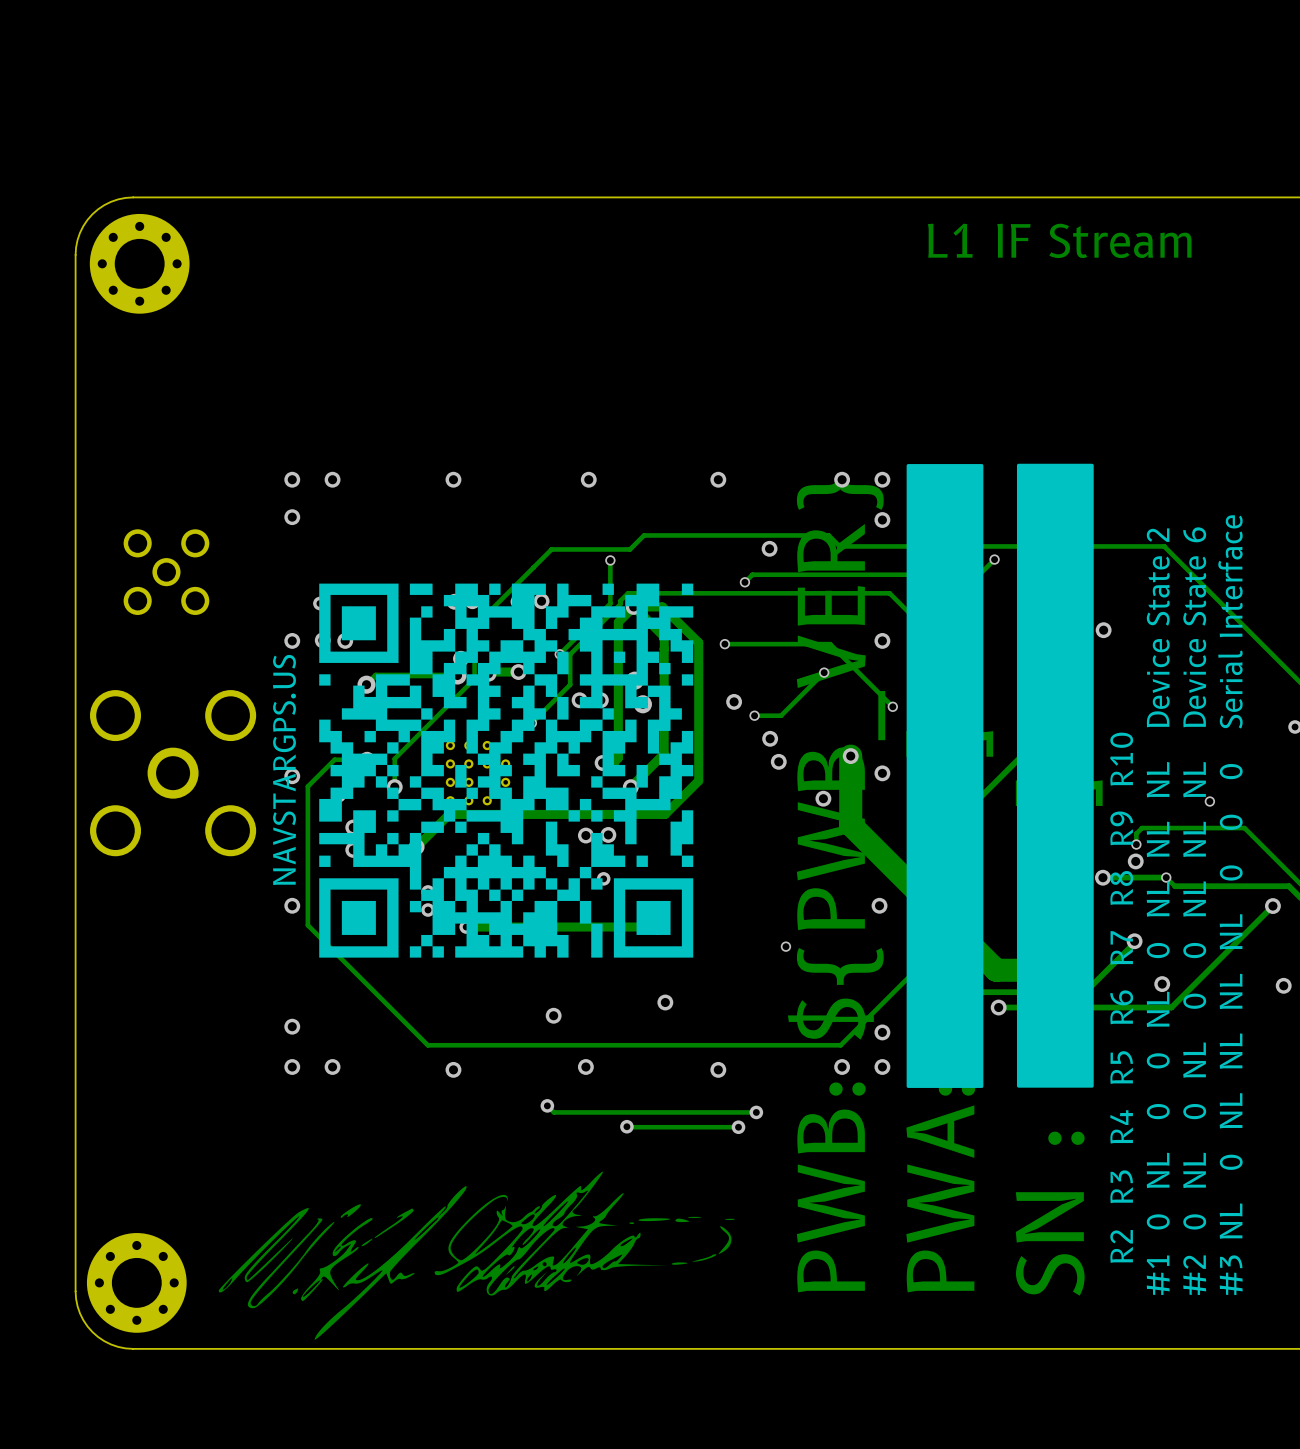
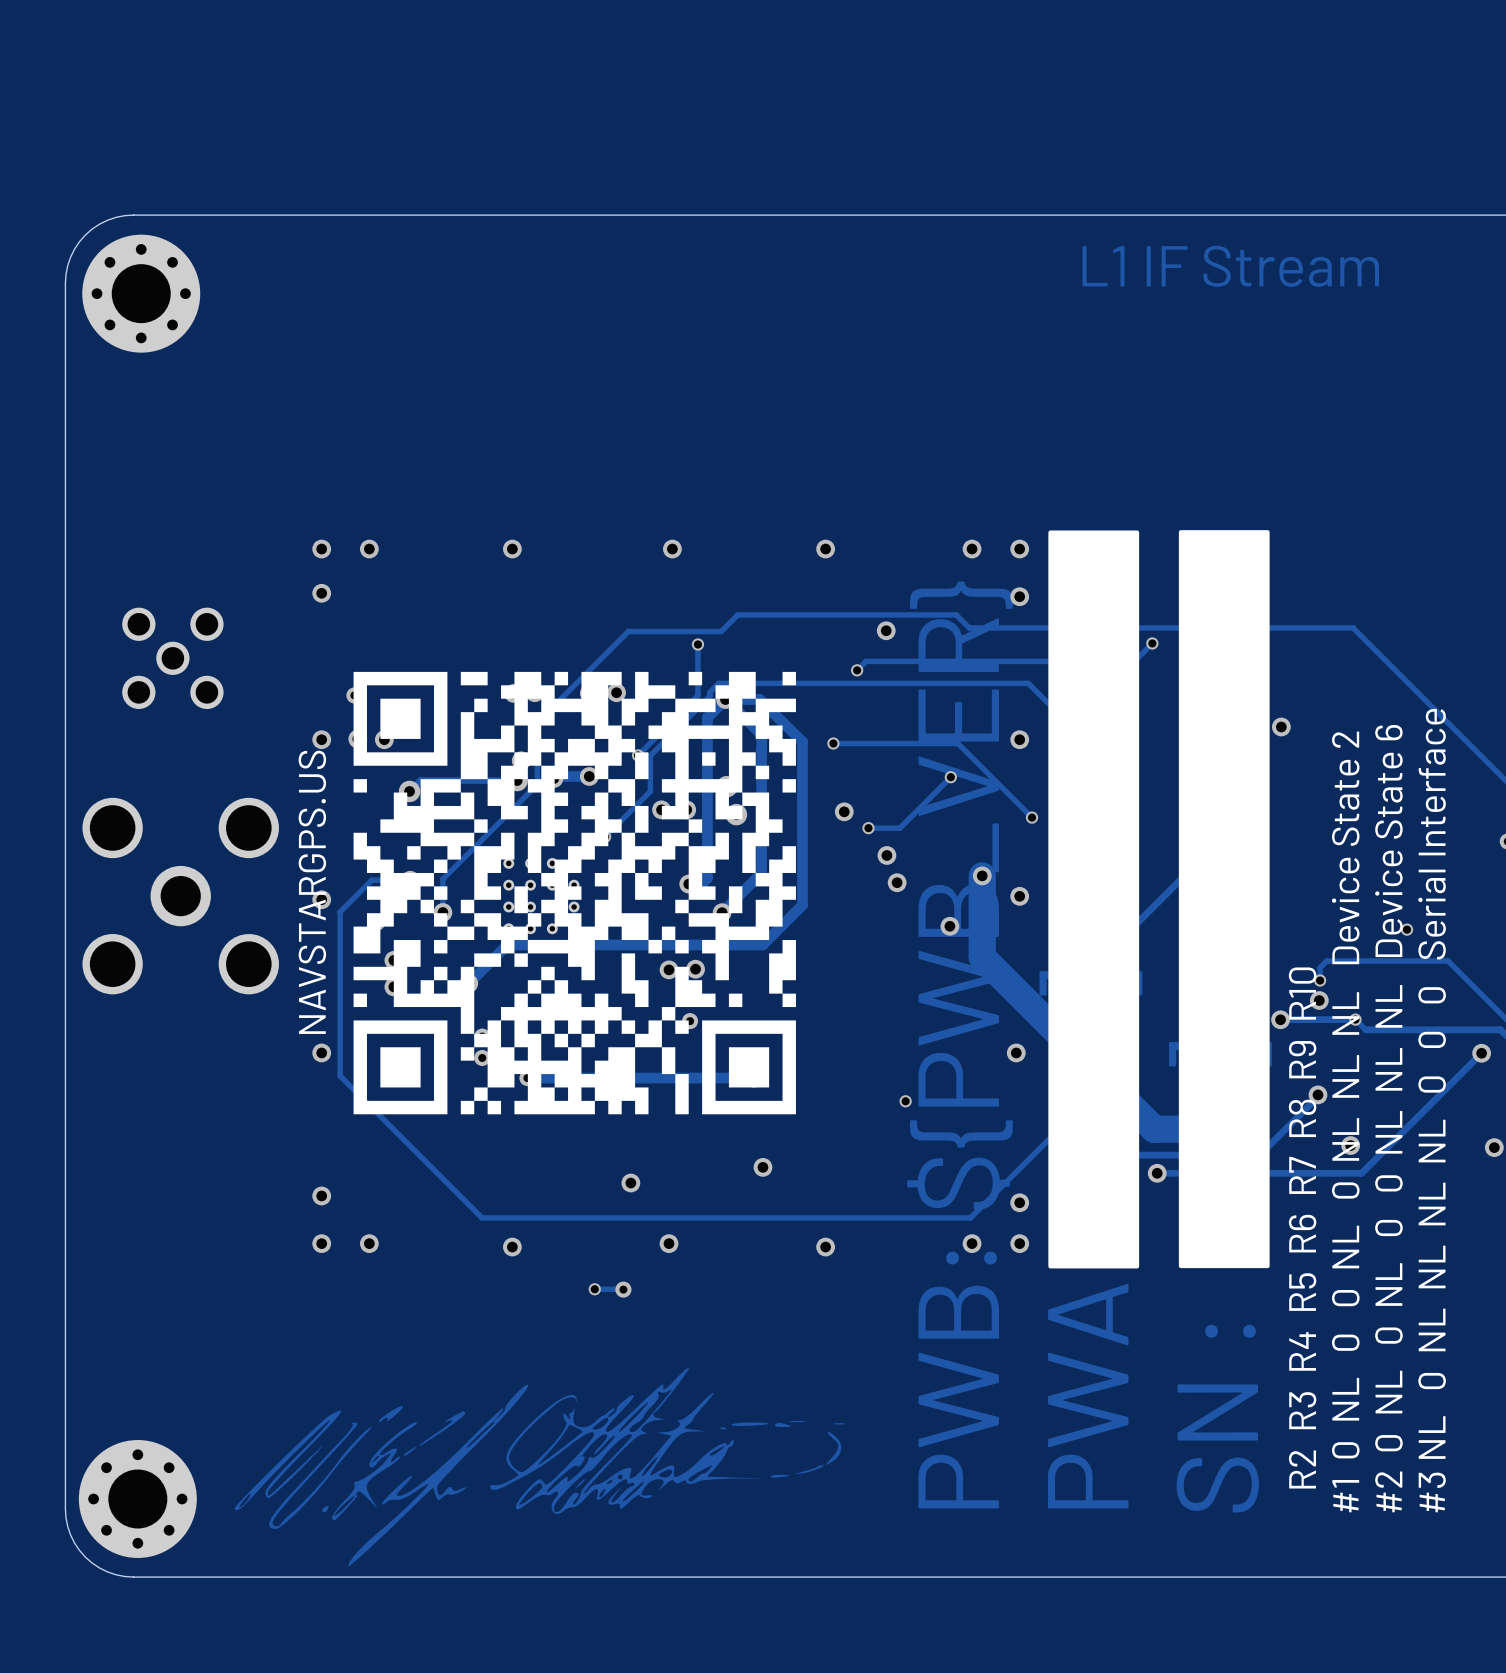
via: none -> (594, 1289)
track: none -> (622, 1289) (594, 1289)
track: (547, 1105) (553, 1112) (756, 1112) -> none
via: (756, 1112) -> none
track: (626, 1126) (738, 1127) -> none
via: (626, 1126) -> none
via: (738, 1127) -> none

